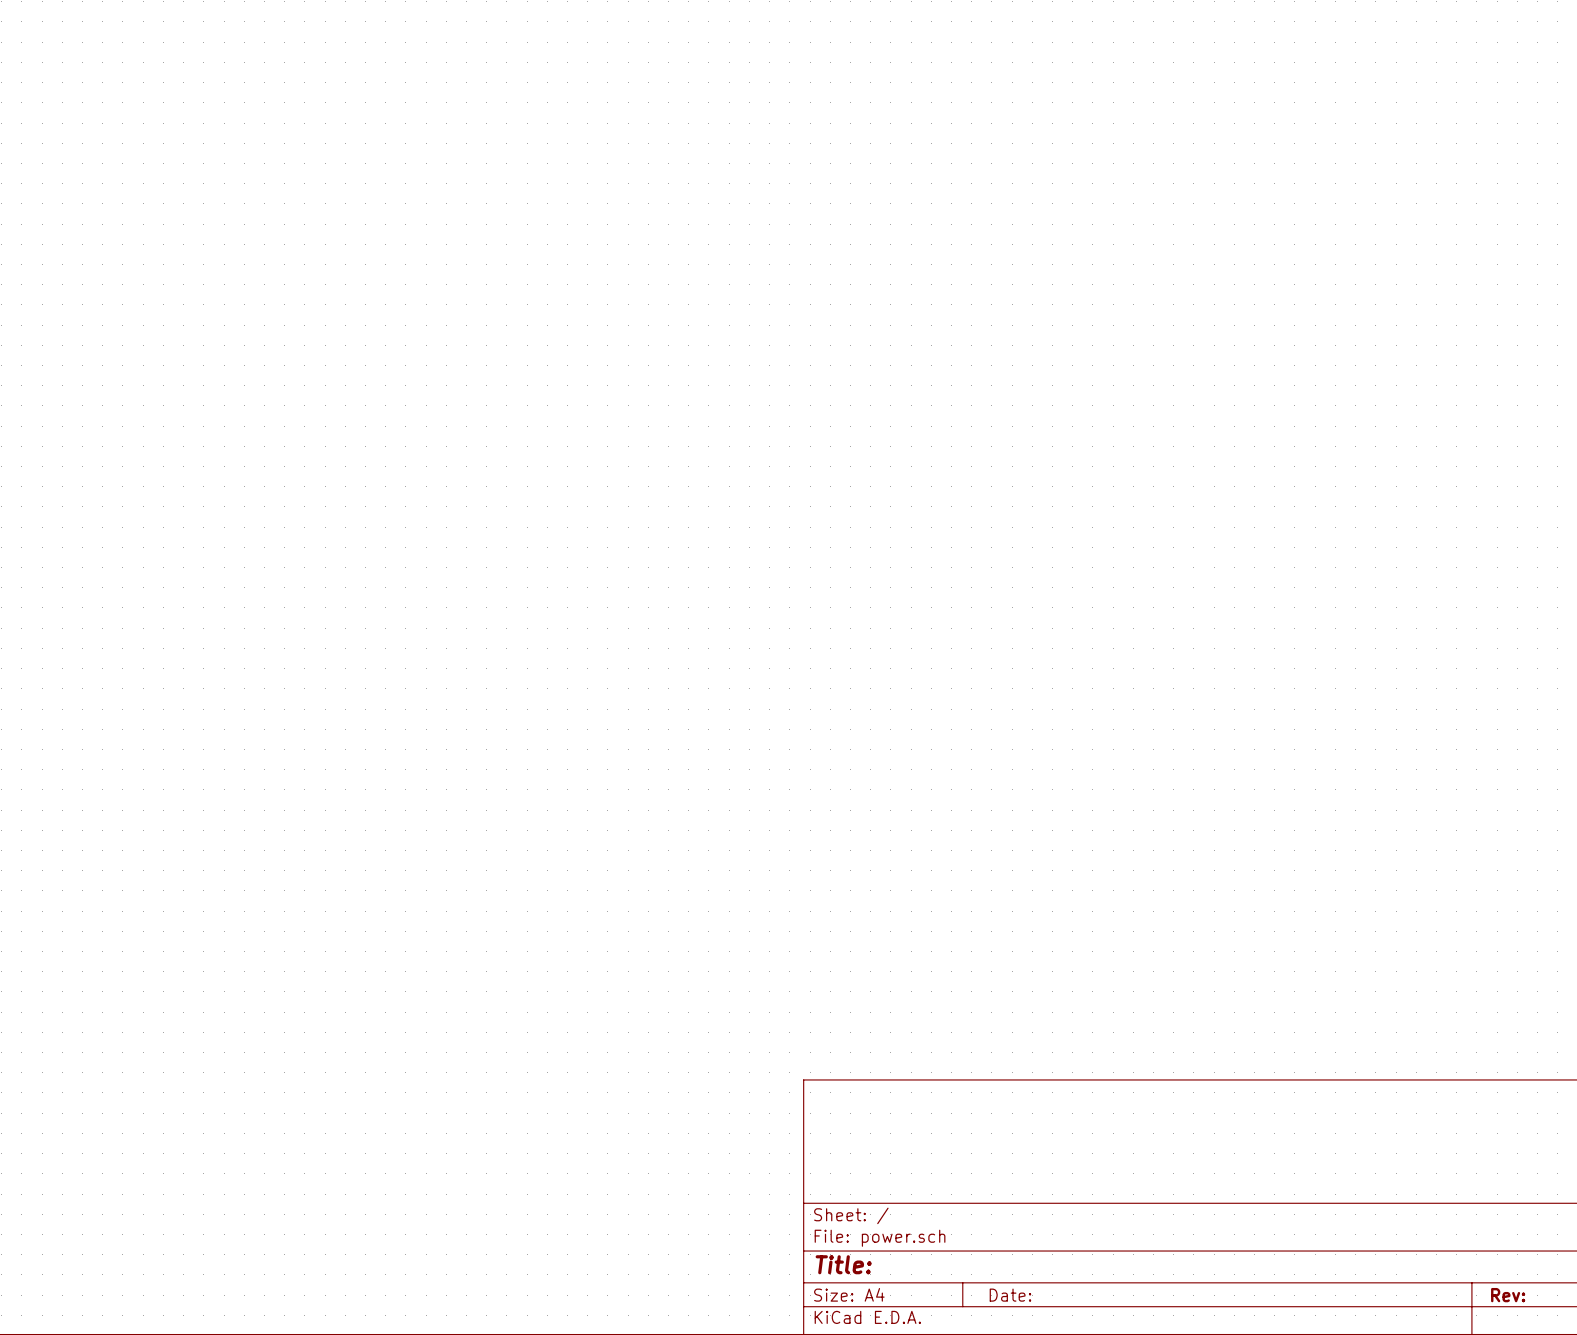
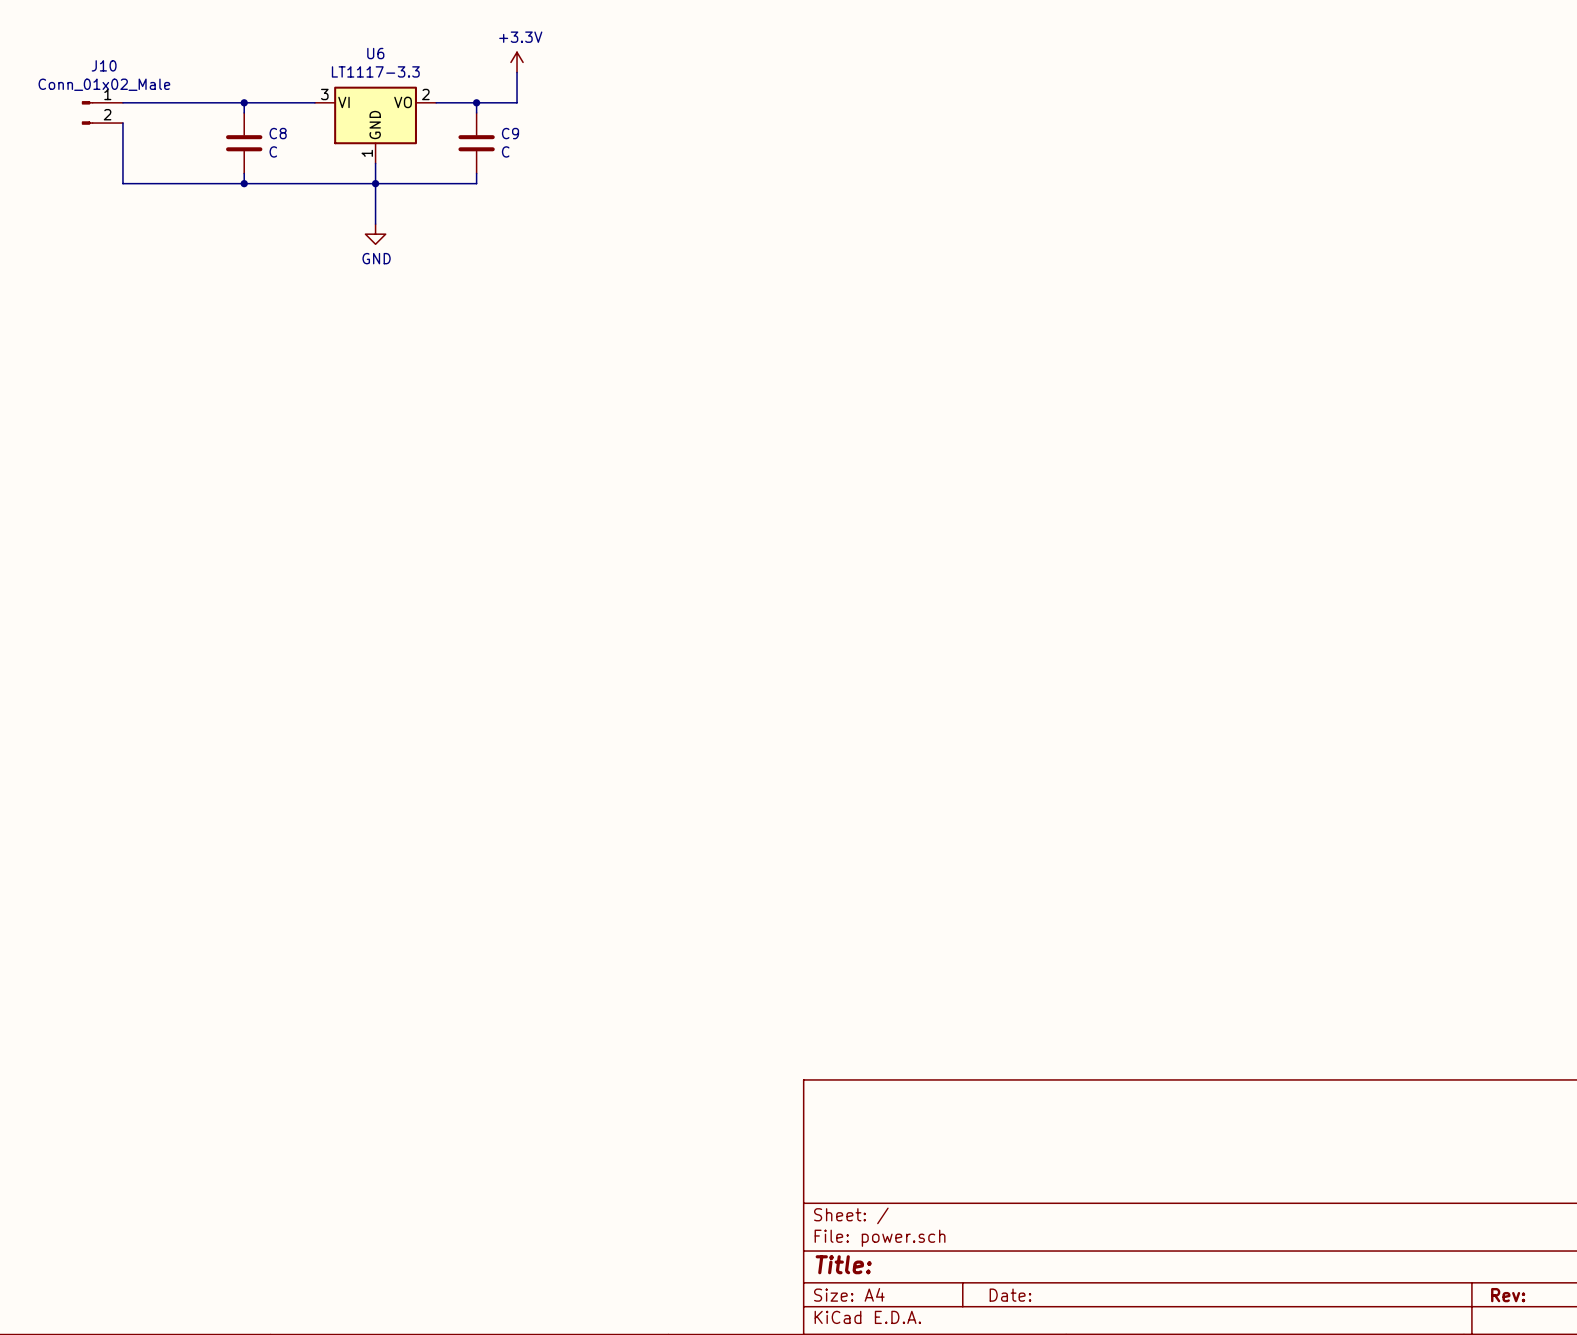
power symbol: none -> +3.3V (517, 62)
wire: none -> (517, 72) (517, 102) (436, 102)
wire: none -> (122, 102) (314, 102)
wire: none -> (244, 102) (244, 112)
junction: none -> (244, 102)
wire: none -> (476, 102) (476, 112)
junction: none -> (476, 102)
J10: none -> Conn_01x02_Male (102, 112)
wire: none -> (122, 123) (122, 183) (476, 183) (476, 173)
U6: none -> LT1117-3.3 (375, 125)
C8: none -> C (244, 143)
C9: none -> C (476, 143)
wire: none -> (375, 163) (375, 224)
wire: none -> (244, 173) (244, 183)
junction: none -> (244, 183)
junction: none -> (375, 183)
power symbol: none -> GND (375, 234)

